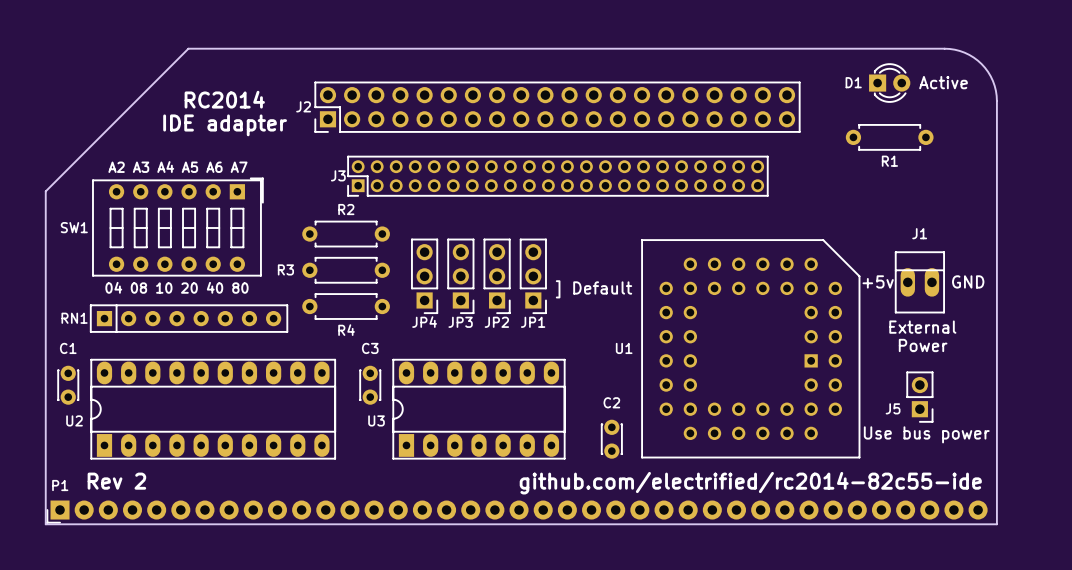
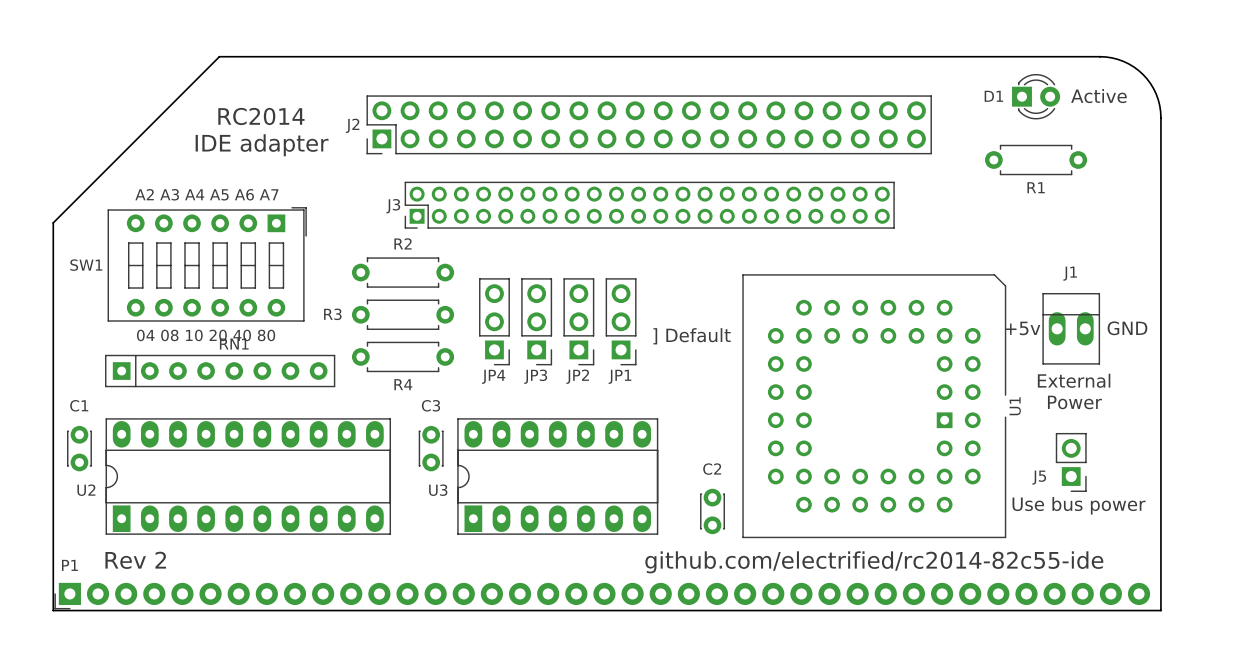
U1 footprint: [641, 239, 861, 459] -> [742, 274, 1007, 539]
RN1 name position: RN1 (74, 318) -> RN1 (234, 344)
U1 name position: U1 (624, 348) -> U1 (1015, 406)

